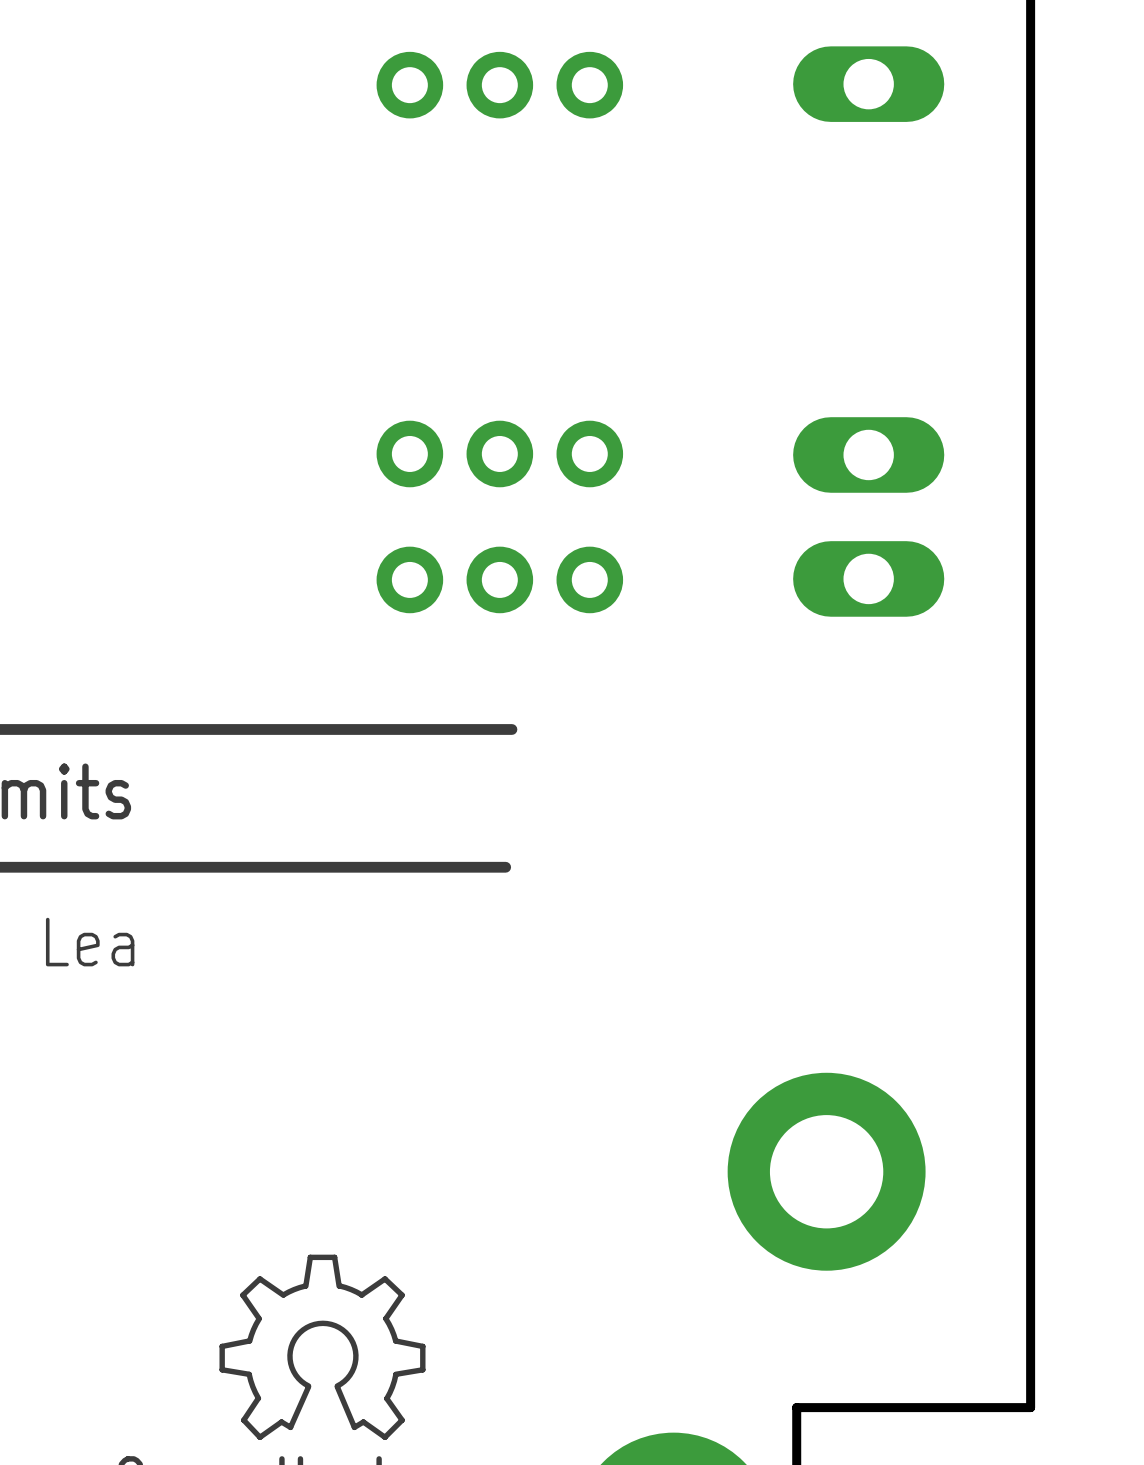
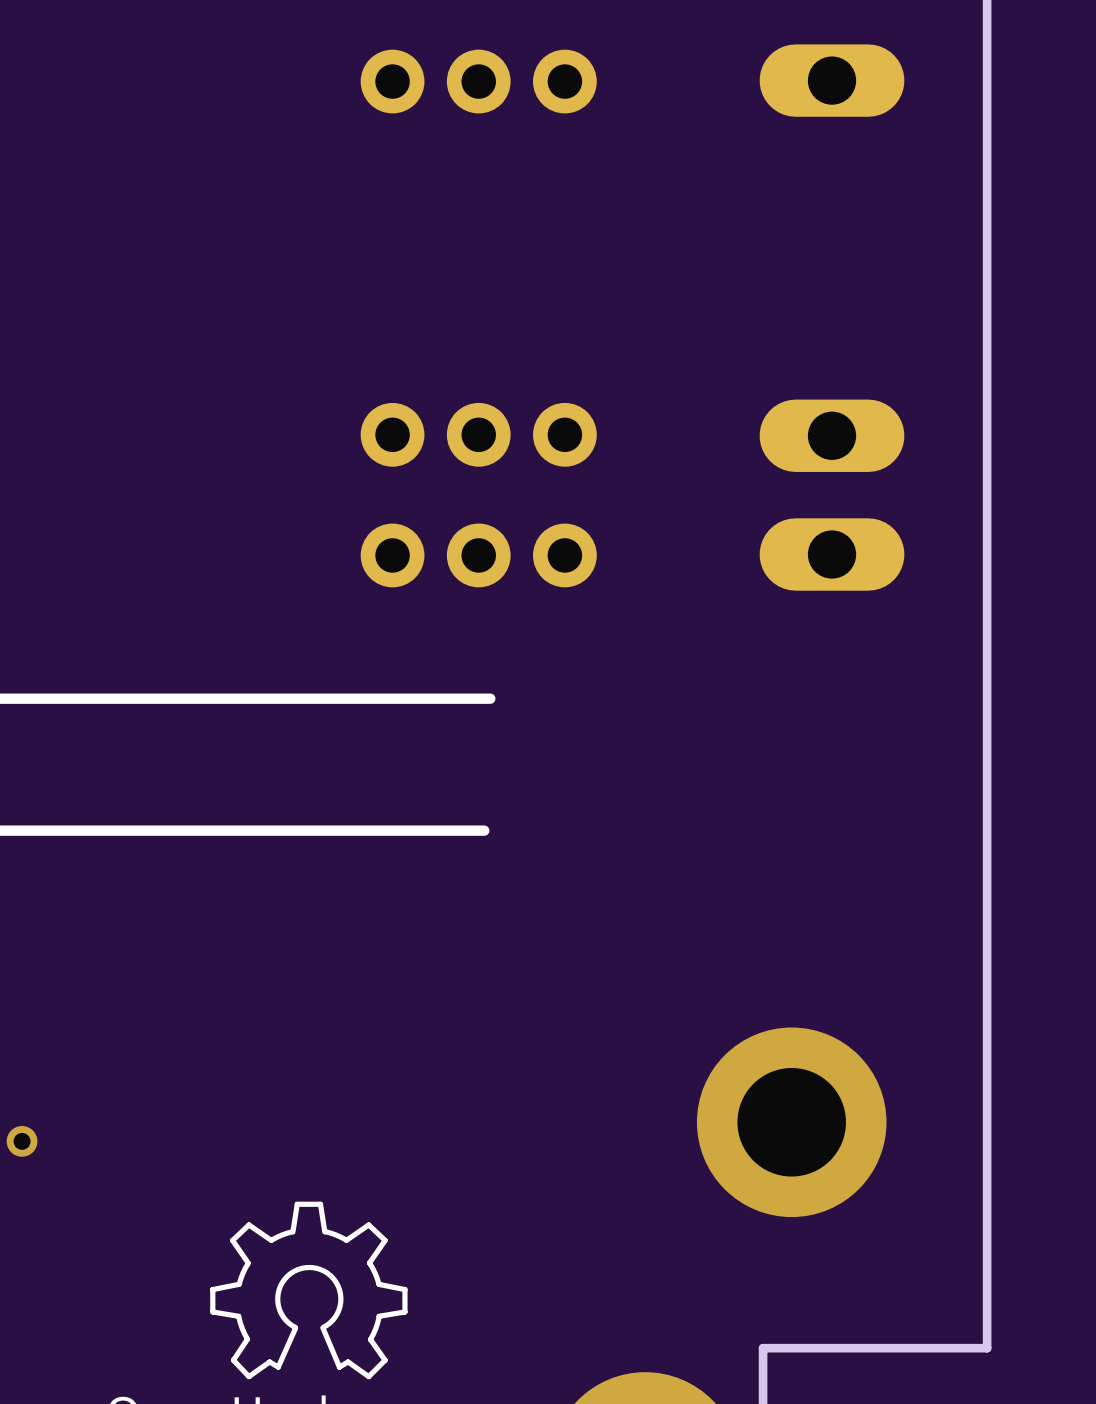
via: none -> (22, 1141)

